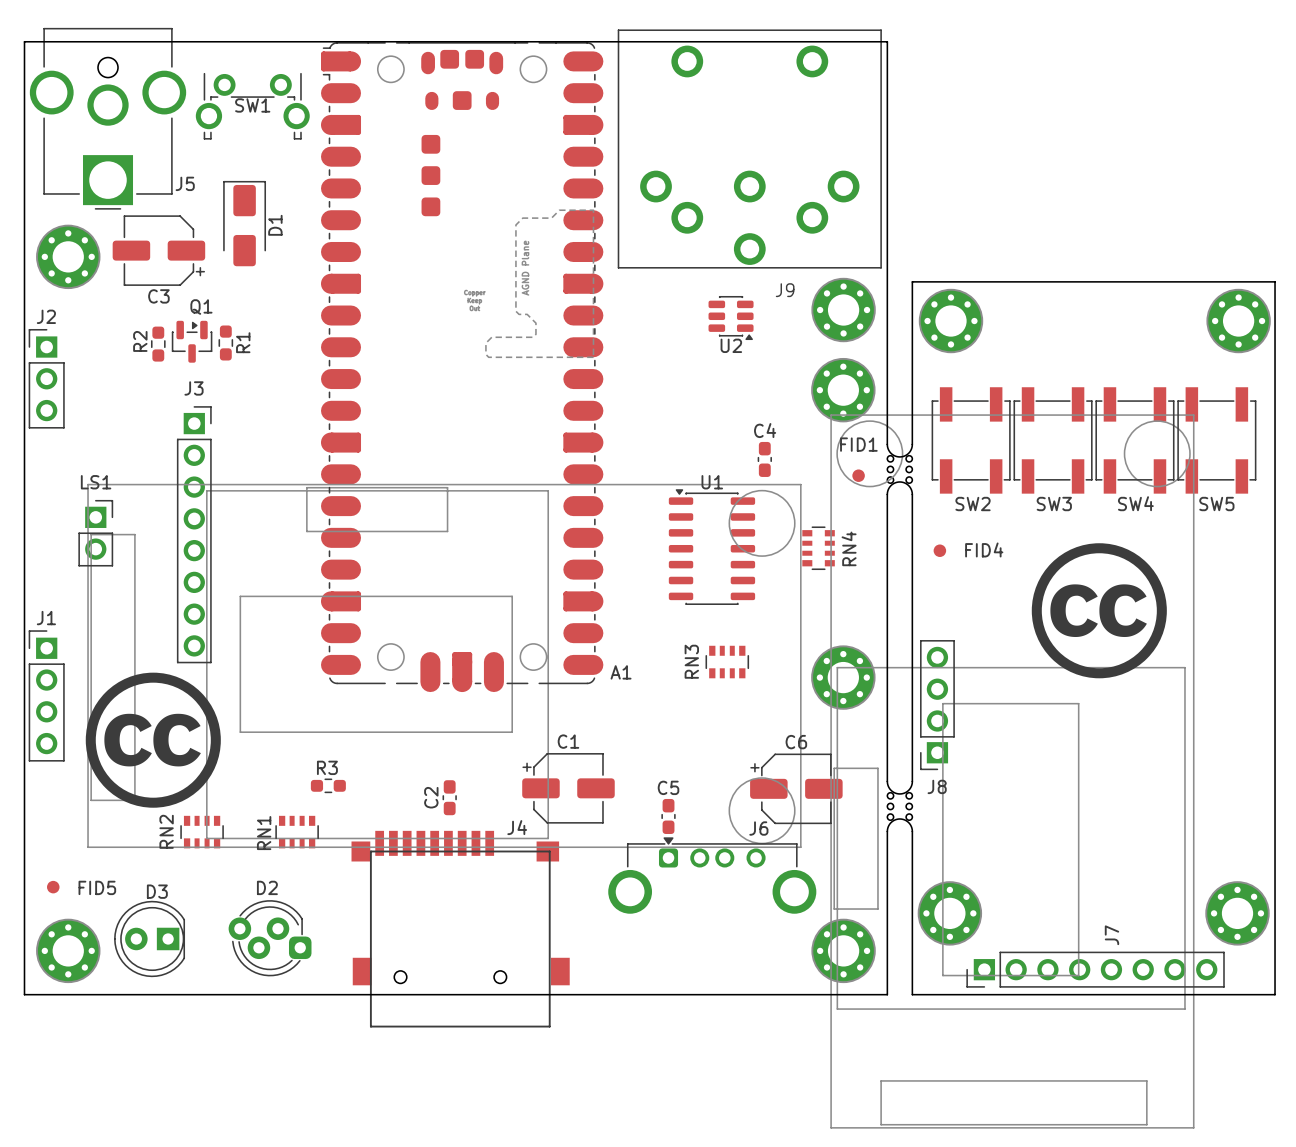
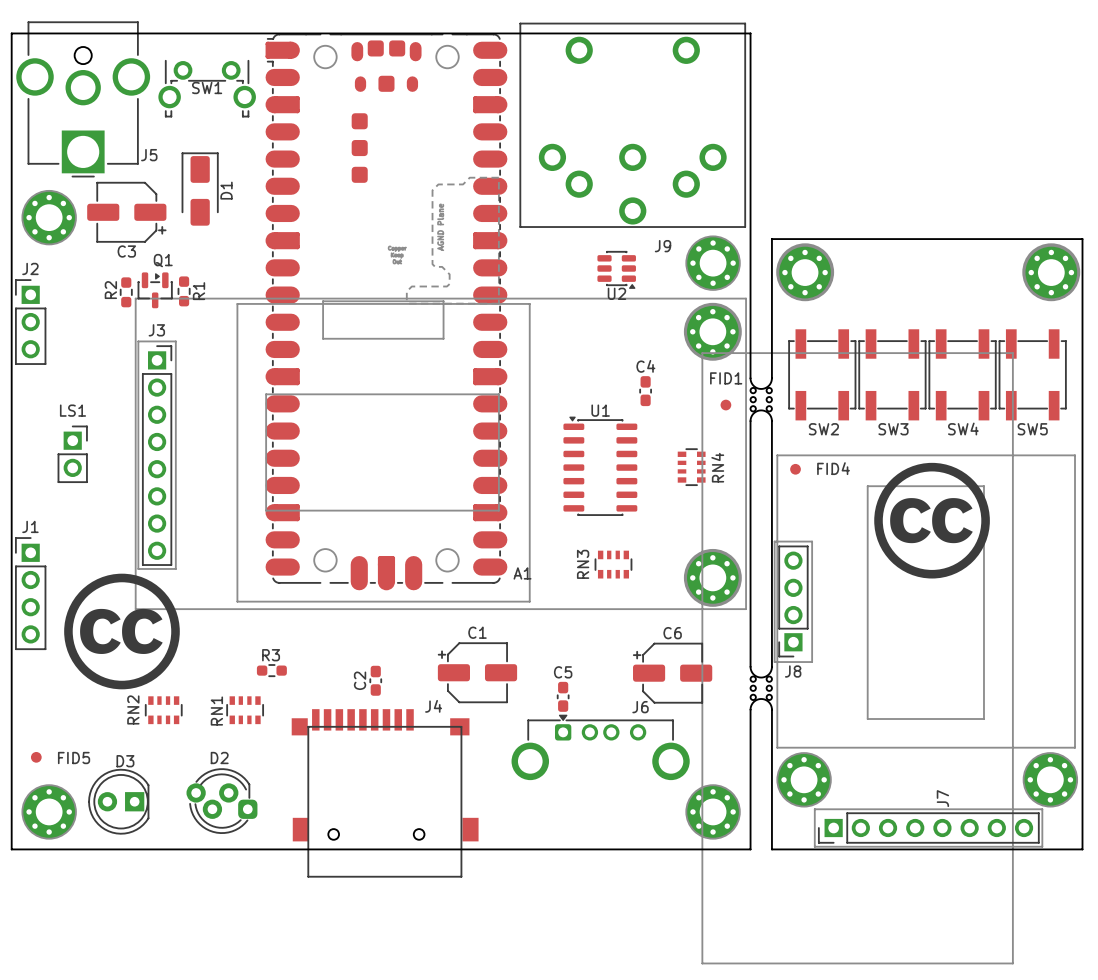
drawing: none -> [776, 243, 834, 301]
drawing: none -> [1022, 243, 1080, 301]
drawing: [1123, 420, 1191, 488] -> none
drawing position: (869, 453) -> (712, 331)
line: (88, 484) (800, 484) (800, 847) (88, 847) (88, 484) -> (135, 298) (746, 298) (746, 609) (135, 609) (135, 298)
line: (306, 487) (447, 487) (447, 531) (306, 531) (306, 487) -> (323, 301) (443, 301) (443, 338) (323, 338) (323, 301)
line: (206, 490) (548, 490) (548, 838) (206, 838) (206, 490) -> (237, 303) (529, 303) (529, 601) (237, 601) (237, 303)
drawing: [728, 490, 796, 557] -> none
line: (91, 534) (134, 534) (134, 800) (91, 800) (91, 534) -> (138, 341) (175, 341) (175, 568) (138, 568) (138, 341)
line: (240, 596) (512, 596) (512, 732) (240, 732) (240, 596) -> (266, 394) (498, 394) (498, 510) (266, 510) (266, 394)
drawing: none -> [684, 549, 742, 607]
line: (837, 667) (1184, 667) (1184, 1009) (837, 1009) (837, 667) -> (777, 455) (1075, 455) (1075, 747) (777, 747) (777, 455)
line: (942, 703) (1078, 703) (1078, 975) (942, 975) (942, 703) -> (867, 486) (983, 486) (983, 719) (867, 719) (867, 486)
line: (834, 768) (877, 768) (877, 909) (834, 909) (834, 768) -> (774, 541) (812, 541) (812, 662) (774, 662) (774, 541)
drawing: [728, 777, 796, 845] -> none
line: (881, 1080) (1146, 1080) (1146, 1124) (881, 1124) (881, 1080) -> (814, 809) (1042, 809) (1042, 846) (814, 846) (814, 809)

